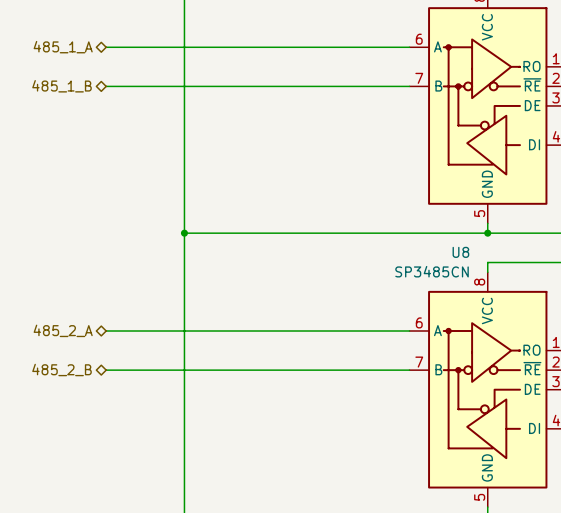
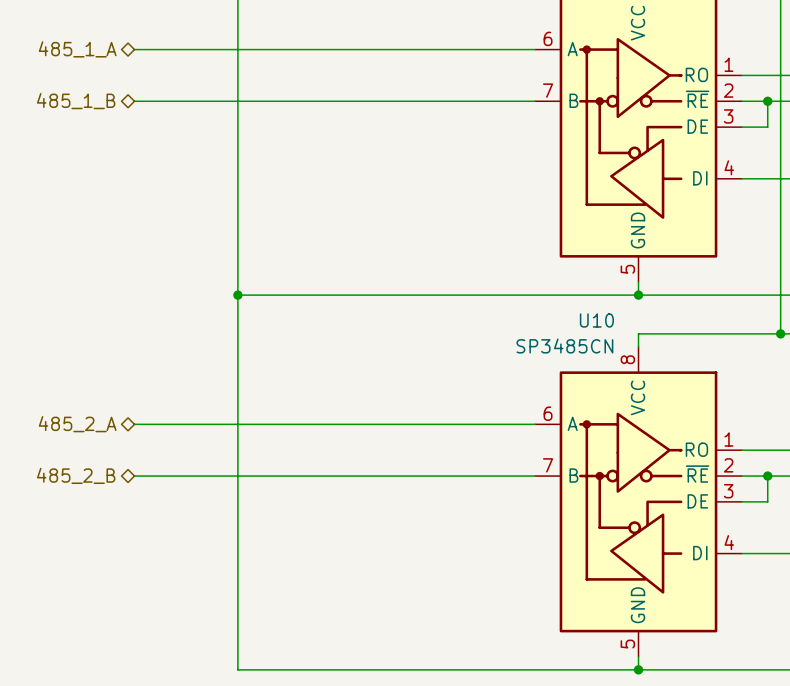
U8 name: U8 (460, 252) -> U10 (596, 320)

